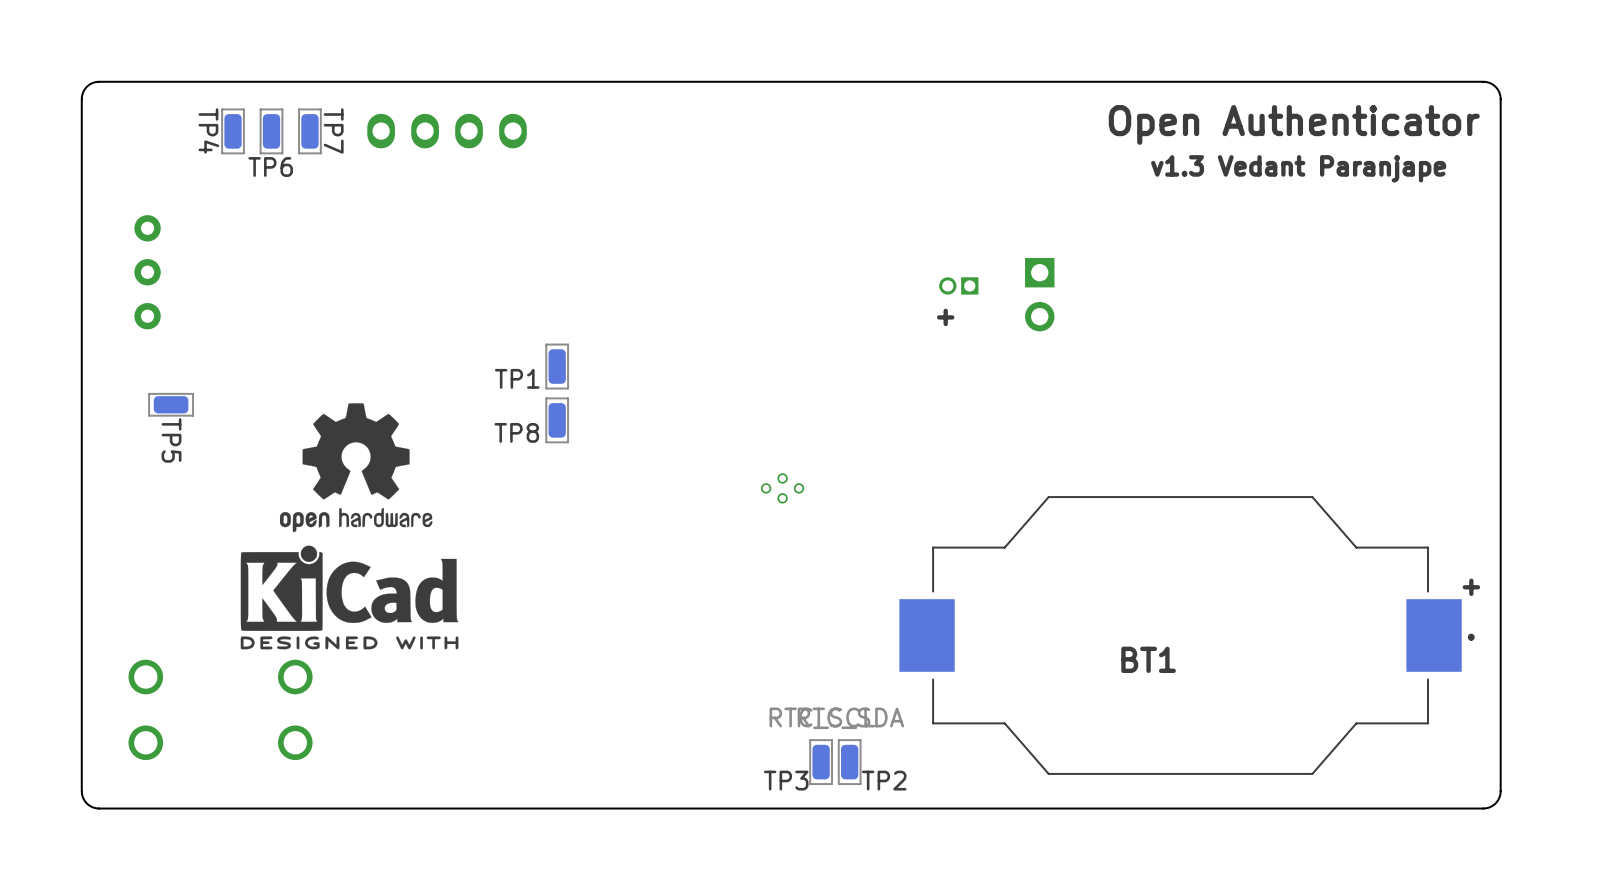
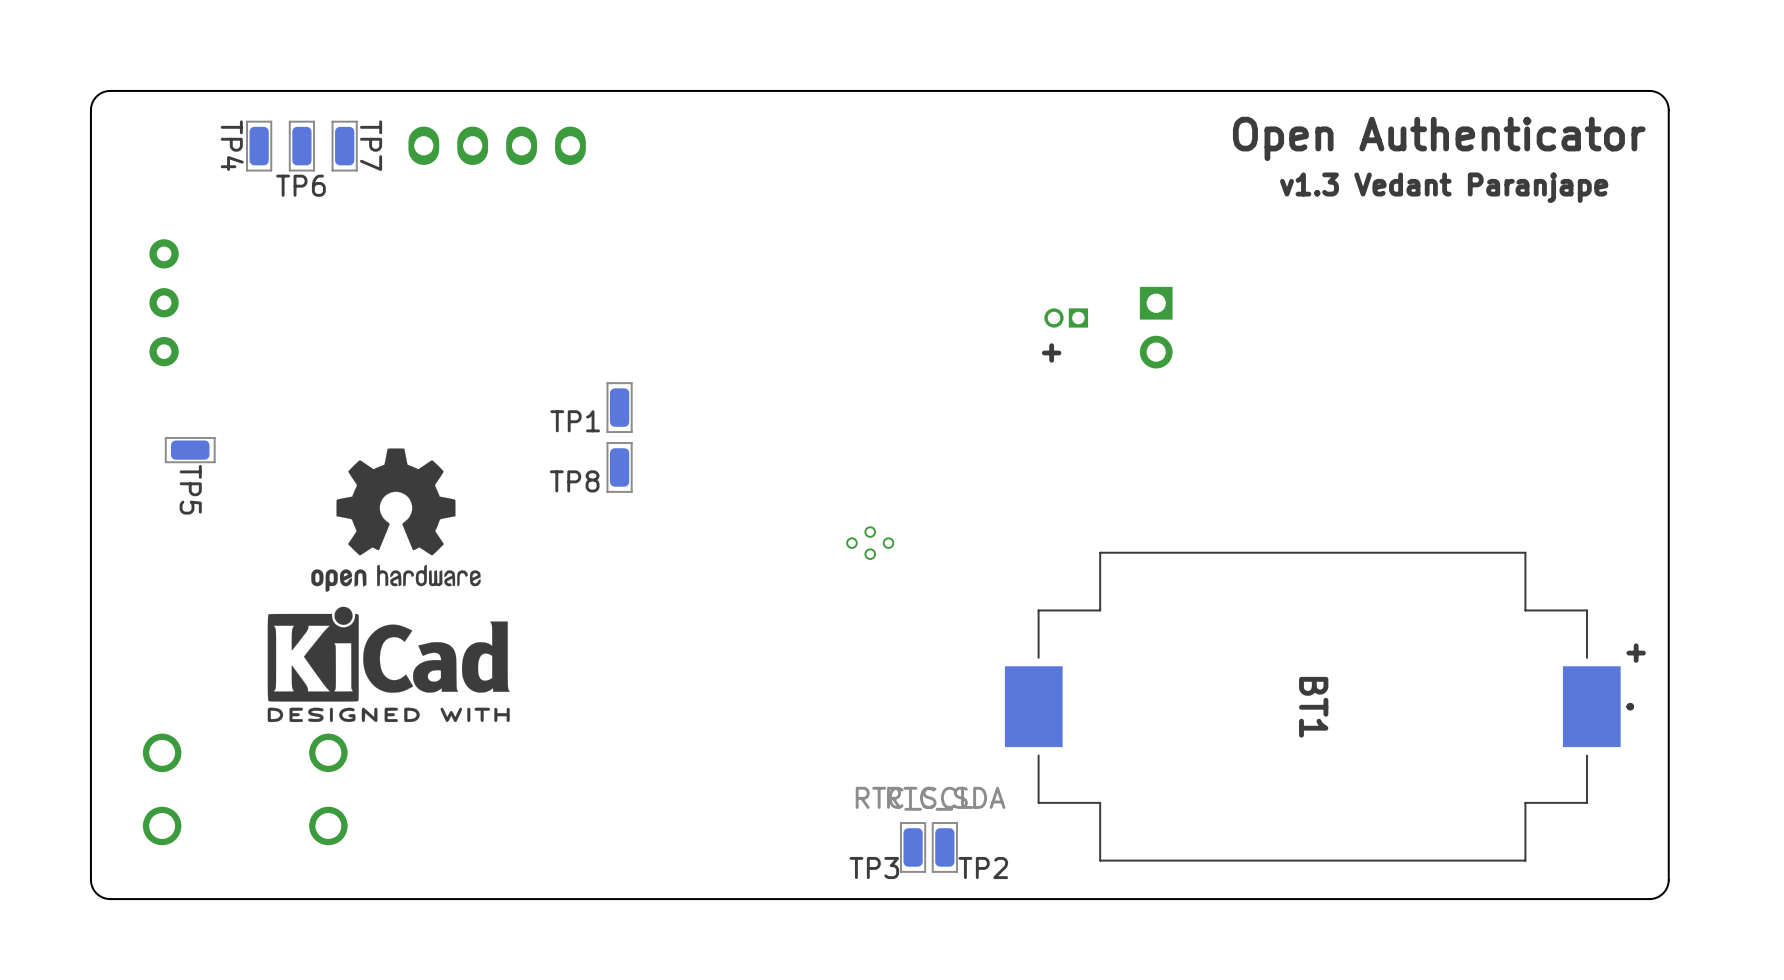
BT1 footprint: [899, 496, 1475, 775] -> [1004, 551, 1635, 862]
BT1 name position: BT1 (1148, 659) -> BT1 (1313, 707)

